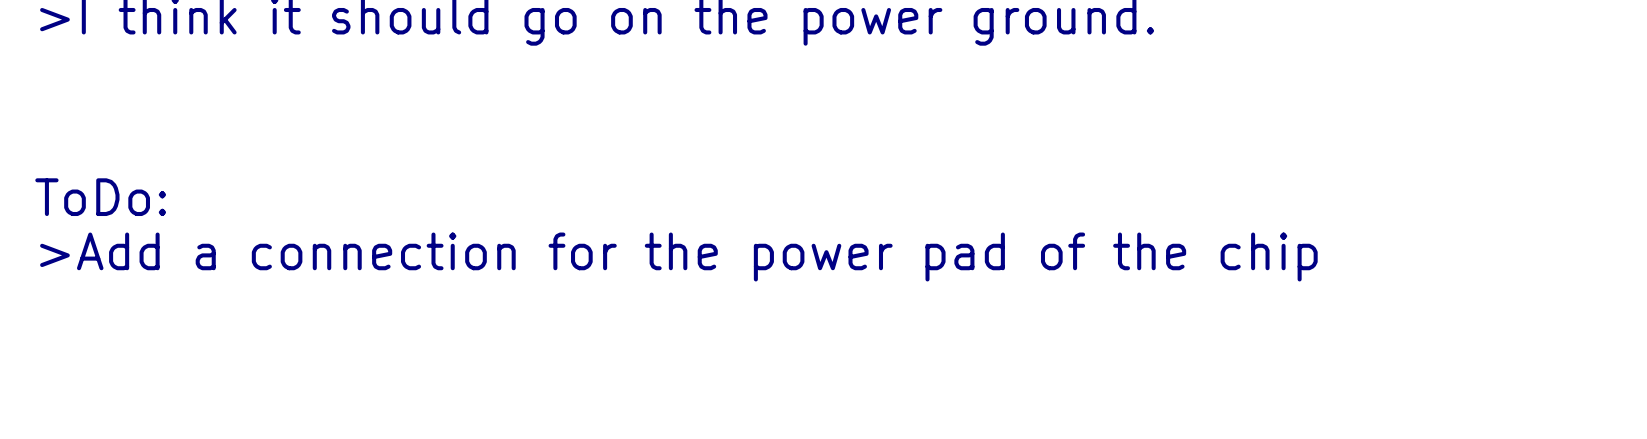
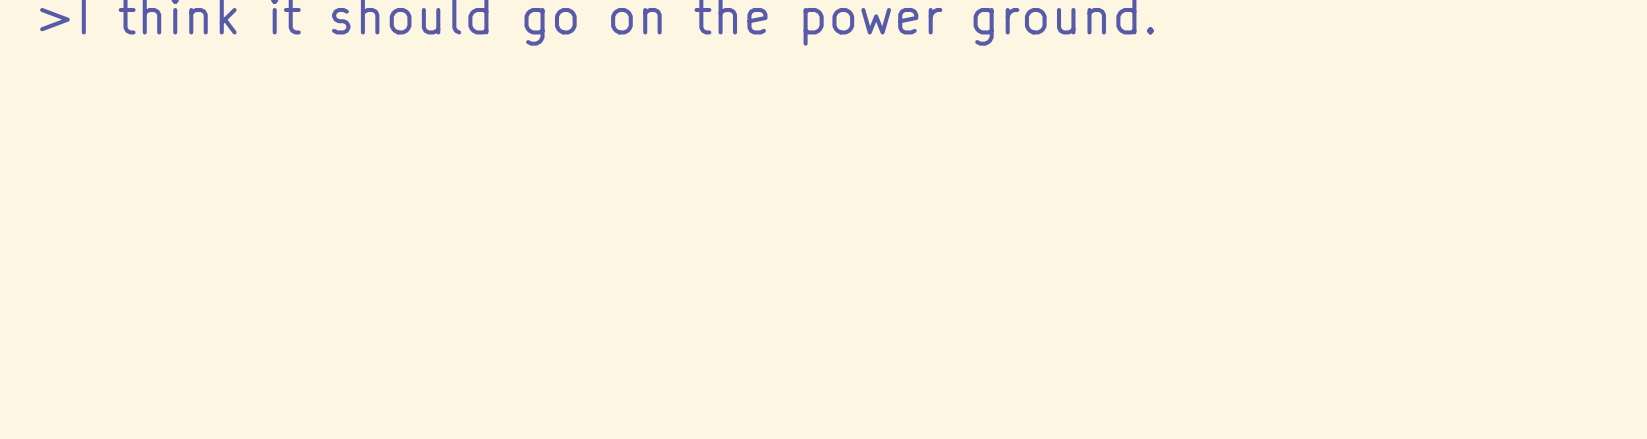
text: ToDo: (100, 197) -> none
text: >Add a connection for the power pad of the chip (678, 257) -> none

